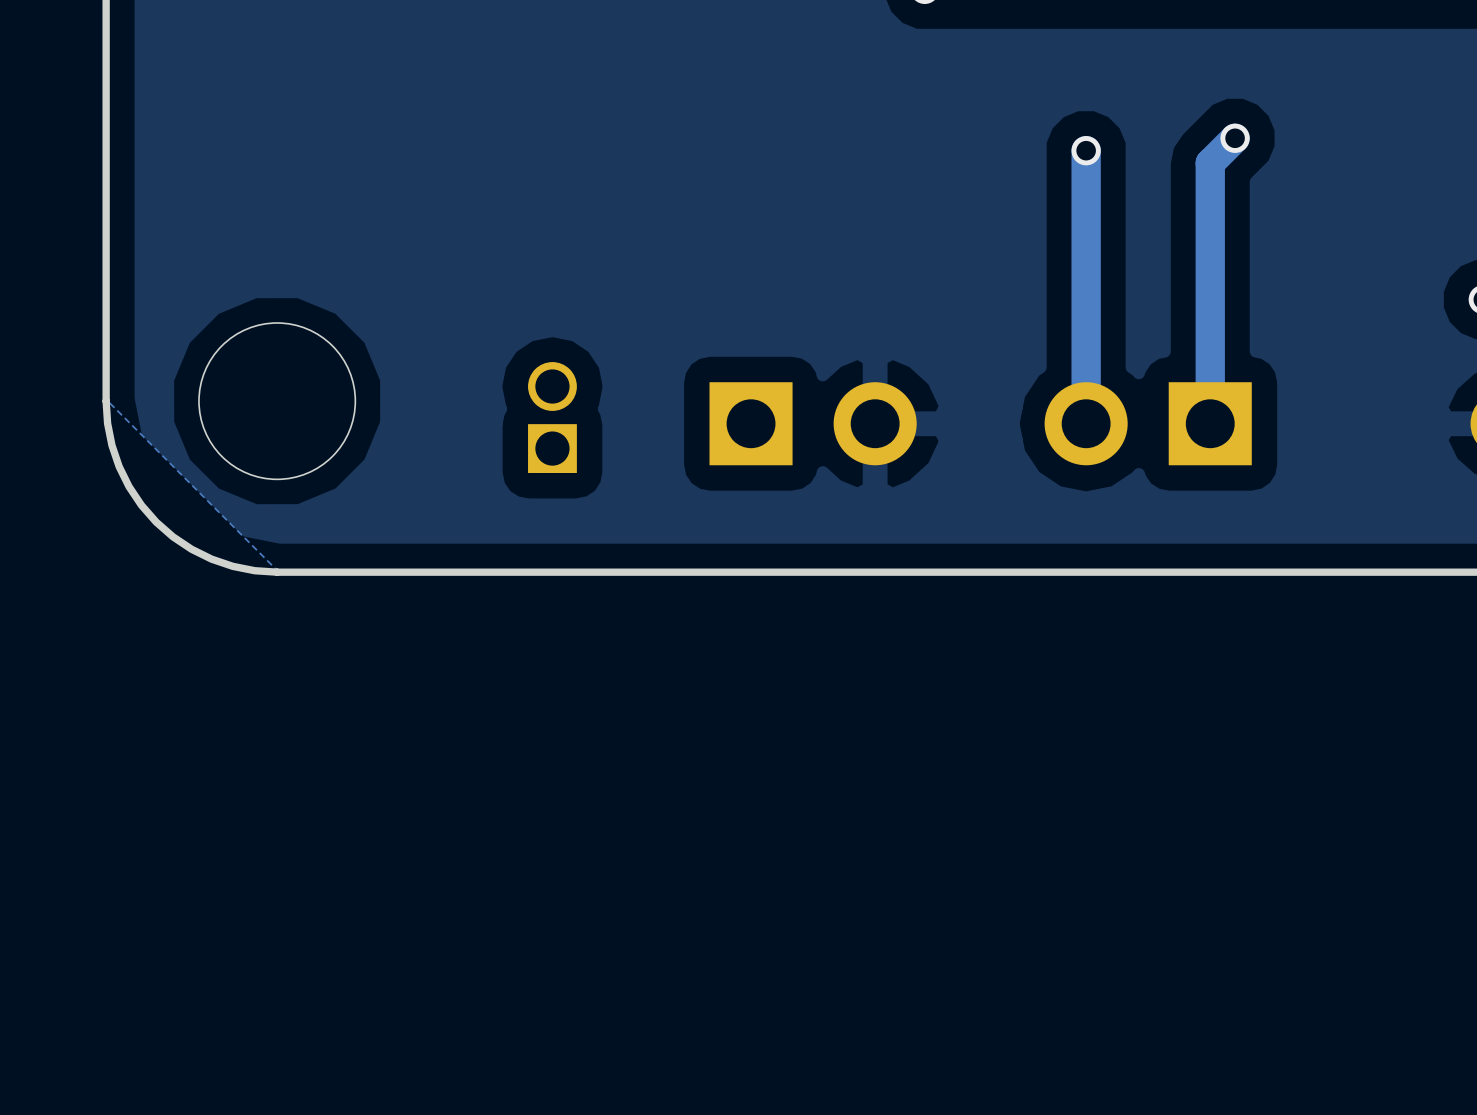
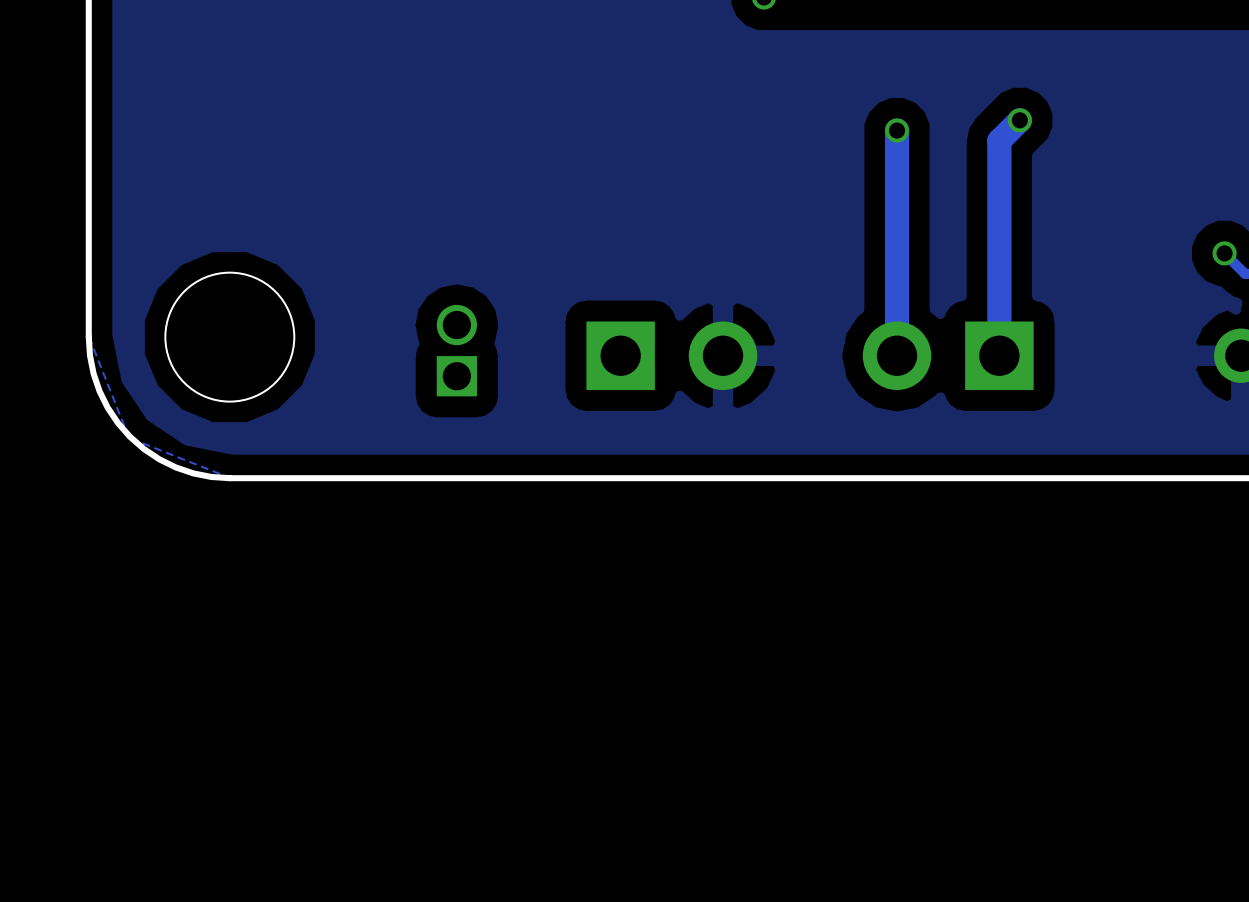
zone outline: (105, 398) (279, 572) -> (88, 335) (129, 437) (231, 478)

